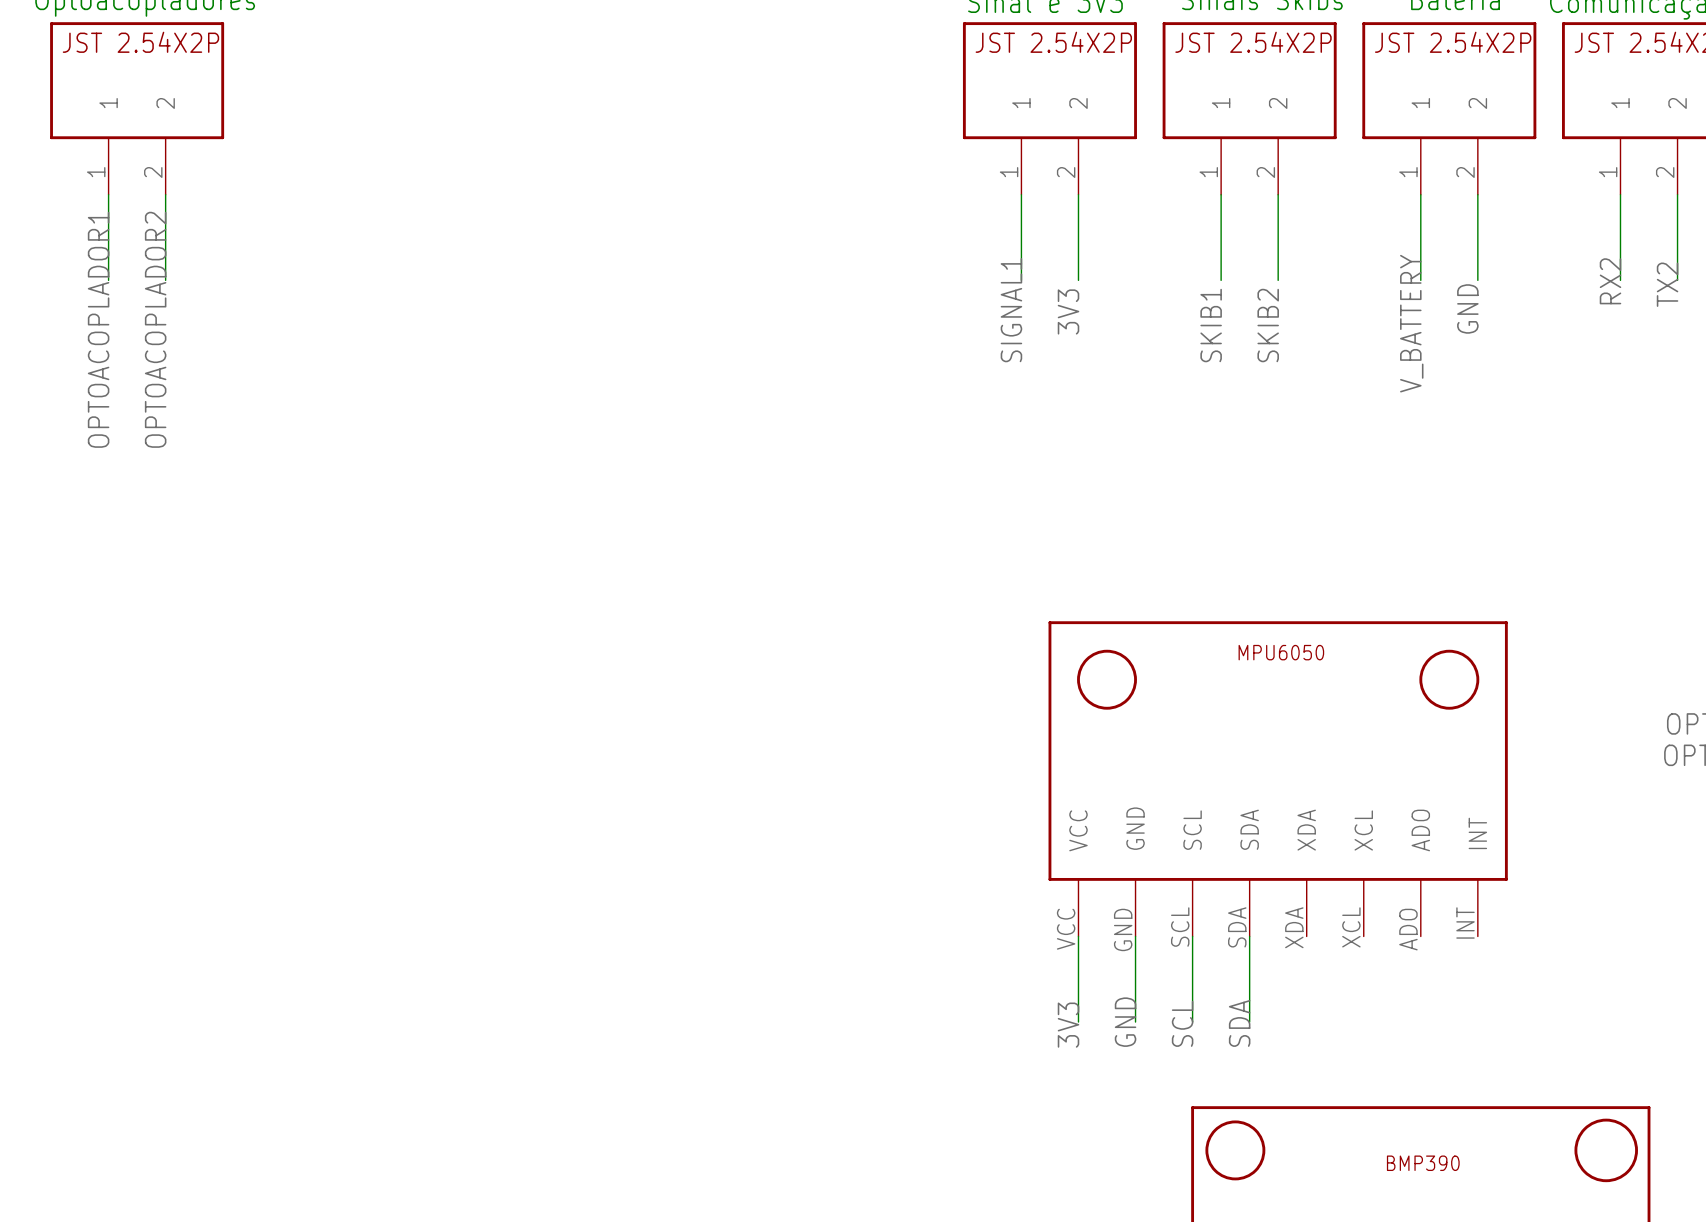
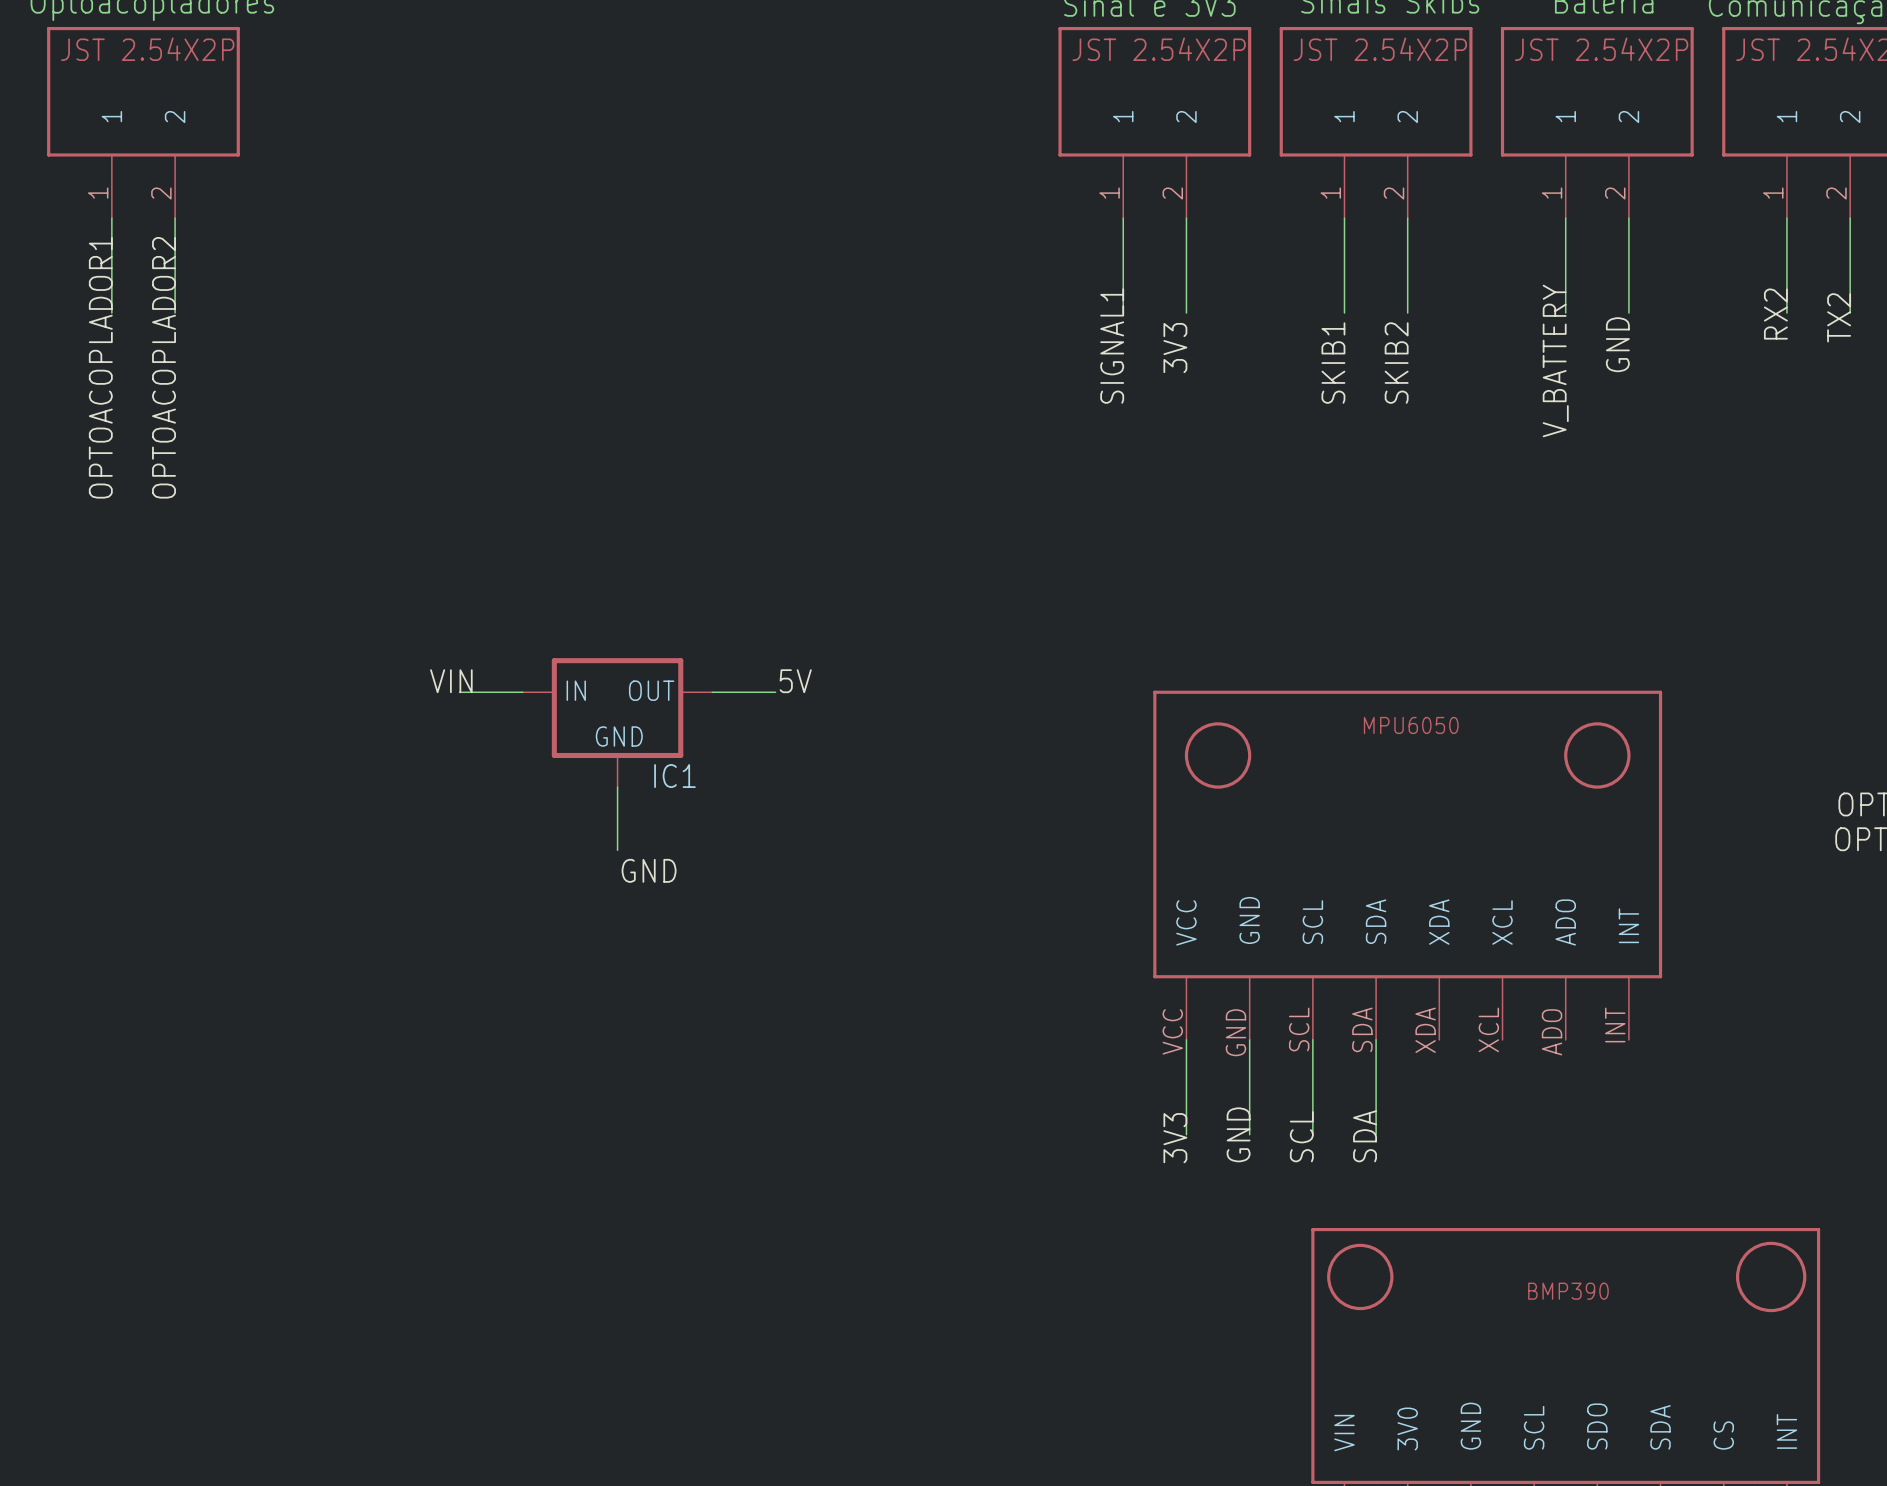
label: none -> VIN (451, 681)
label: none -> 5V (795, 681)
wire: none -> (459, 692) (522, 692)
wire: none -> (712, 692) (775, 692)
IC1: none -> (617, 722)
wire: none -> (617, 787) (617, 850)
label: none -> GND (649, 870)

